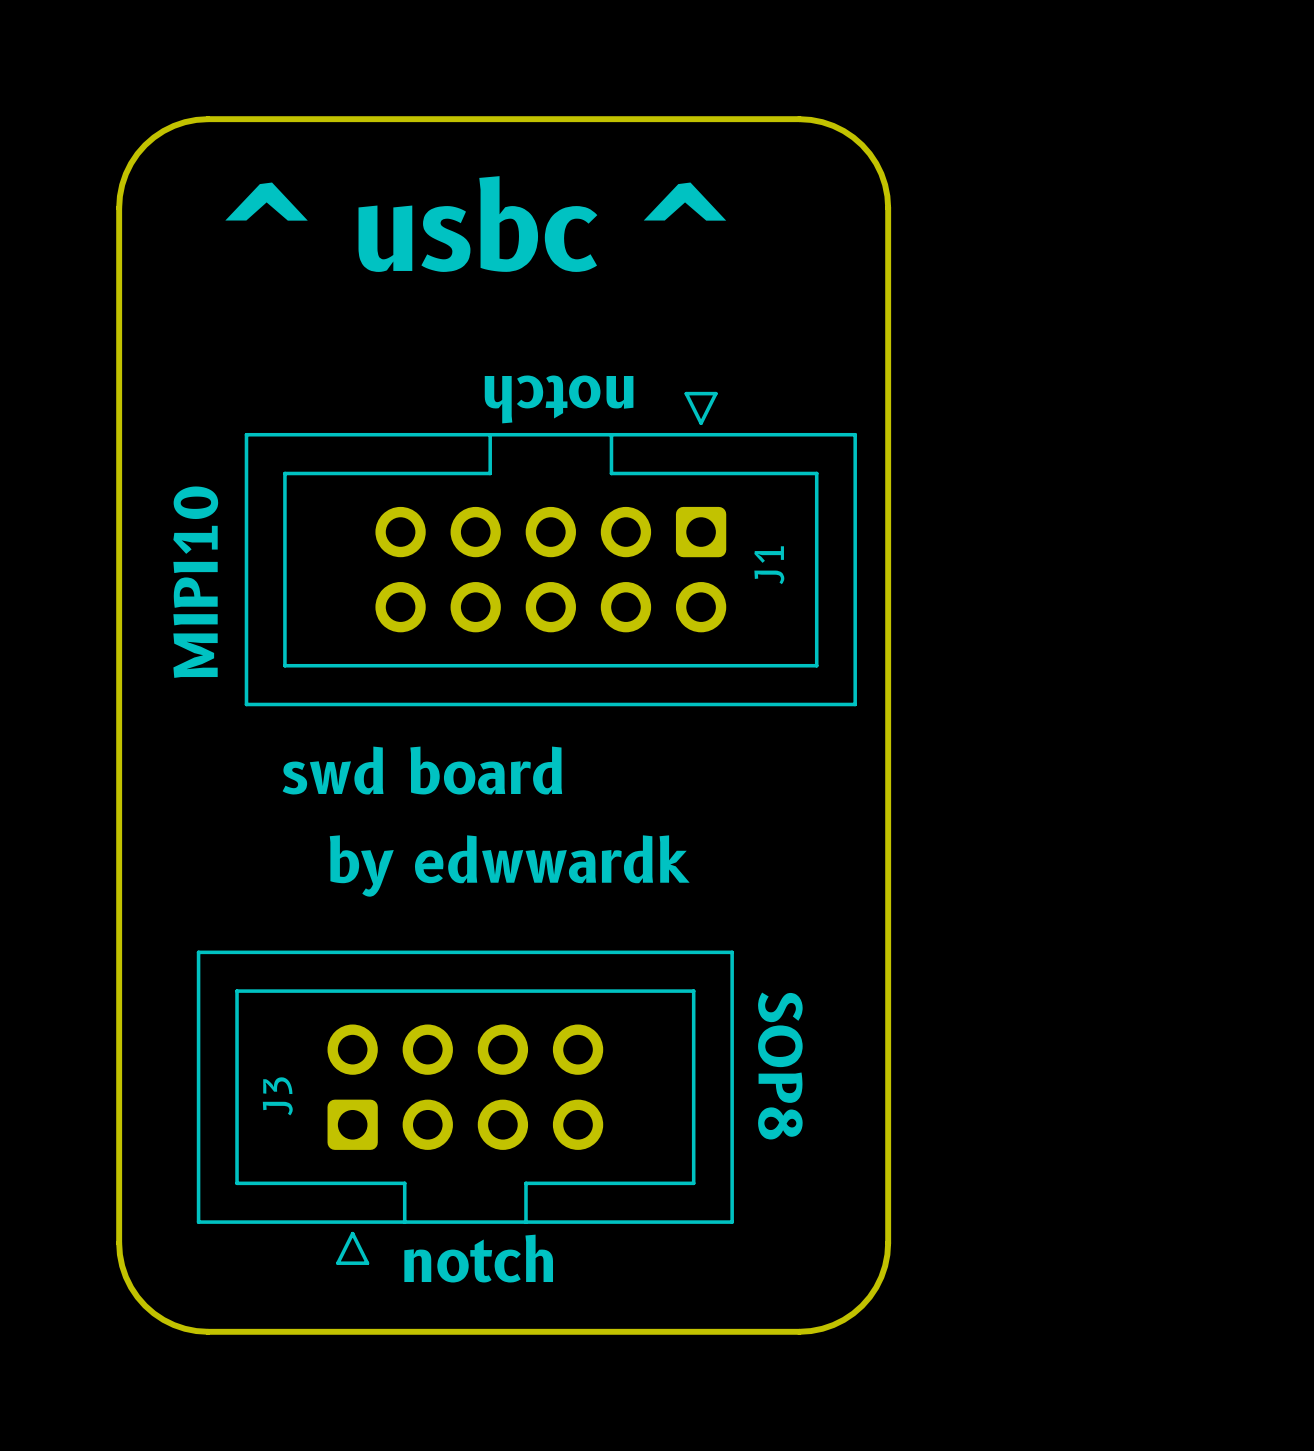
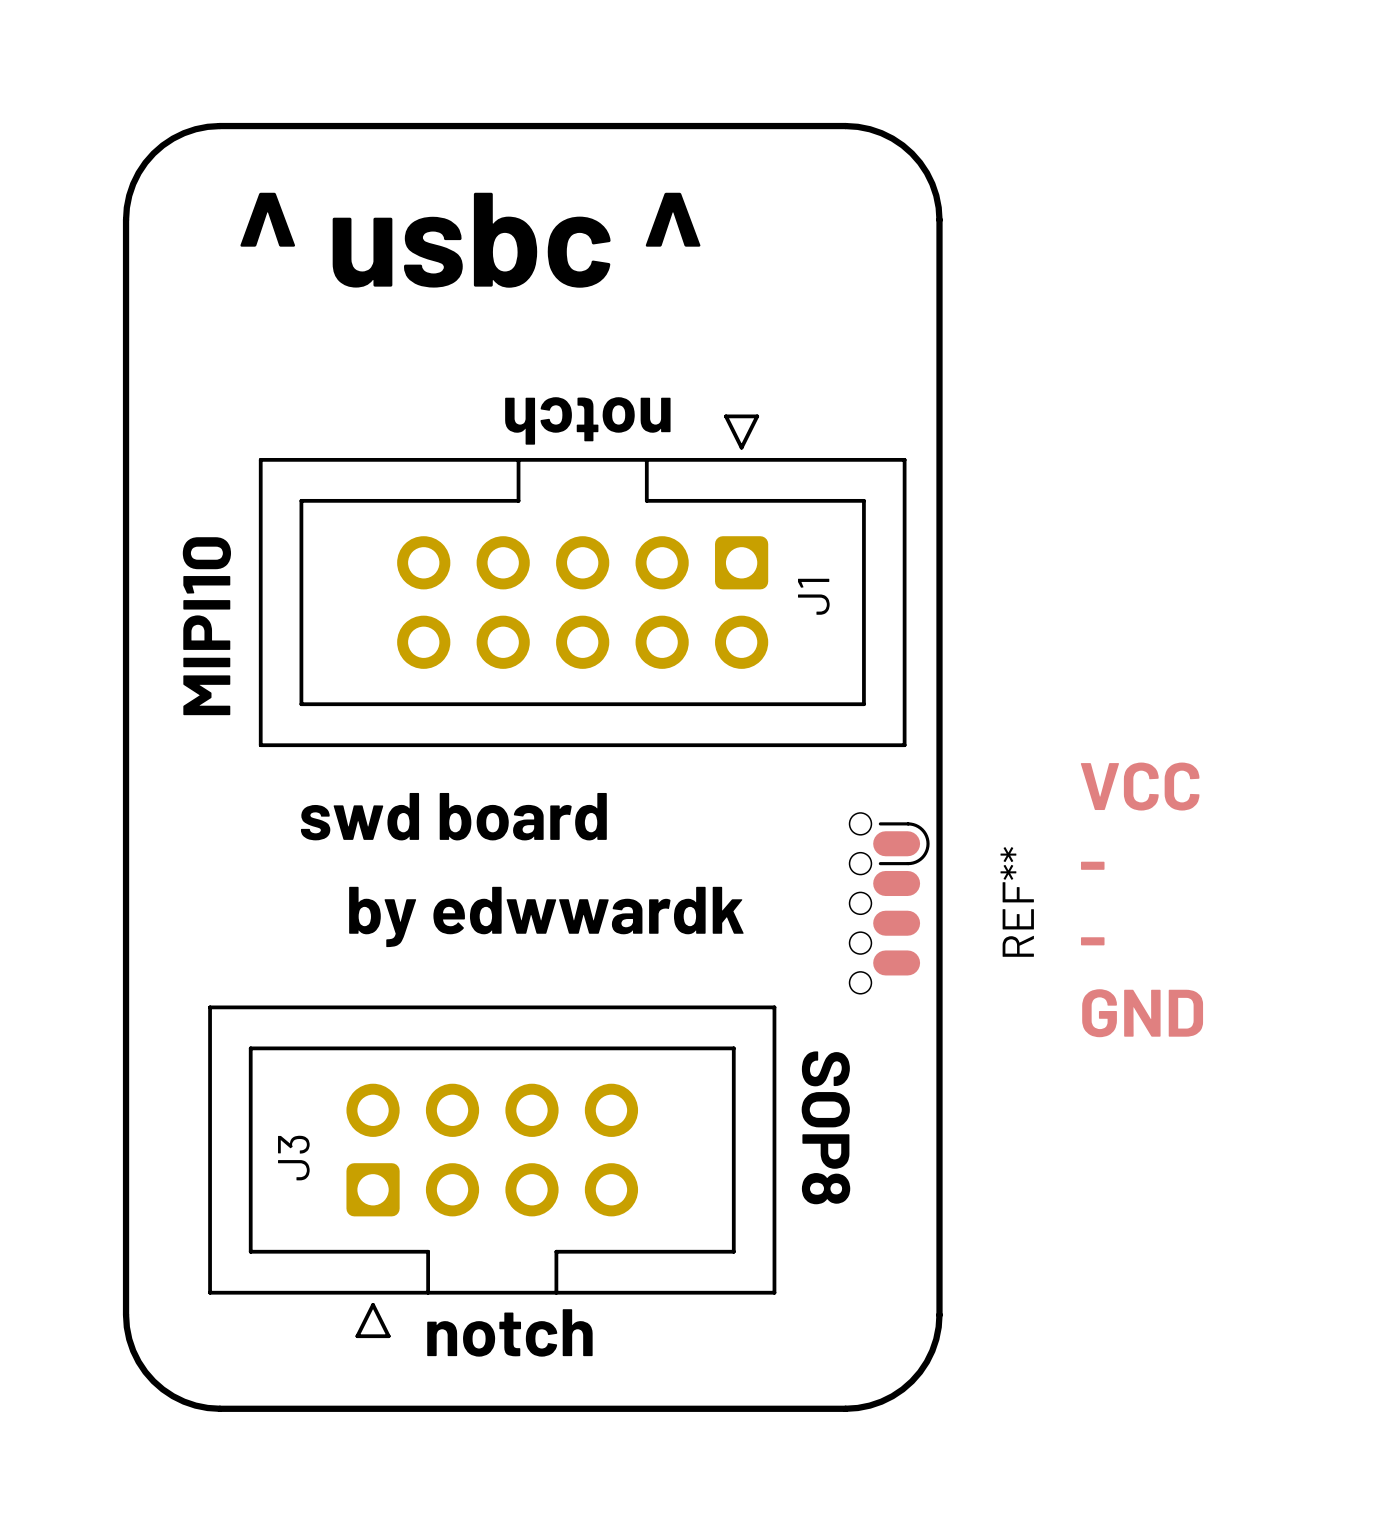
text: none -> VCC (1140, 786)
text: none -> - (1092, 865)
REF**: none -> (889, 903)
text: none -> - (1092, 941)
text: none -> GND (1142, 1013)

